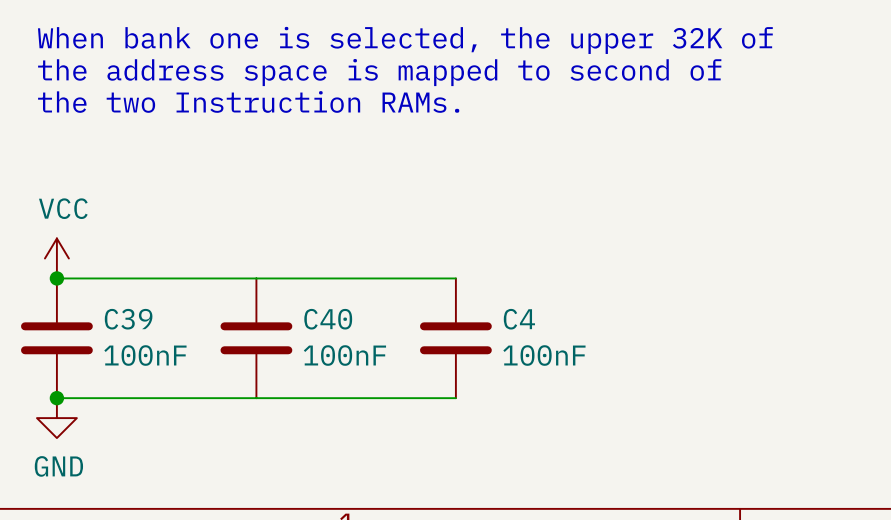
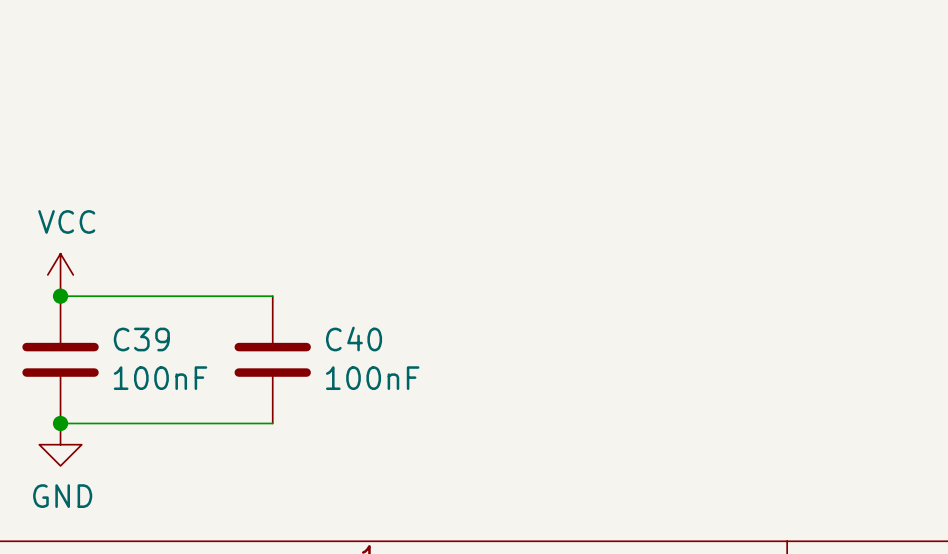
text: When bank one is selected, the upper 32K of (405, 40) -> none
text: the address space is mapped to second of (379, 72) -> none
text: the two Instruction RAMs. (248, 101) -> none
wire: (256, 278) (455, 278) -> none
C4: 100nF (455, 338) -> none
wire: (256, 398) (455, 398) -> none

